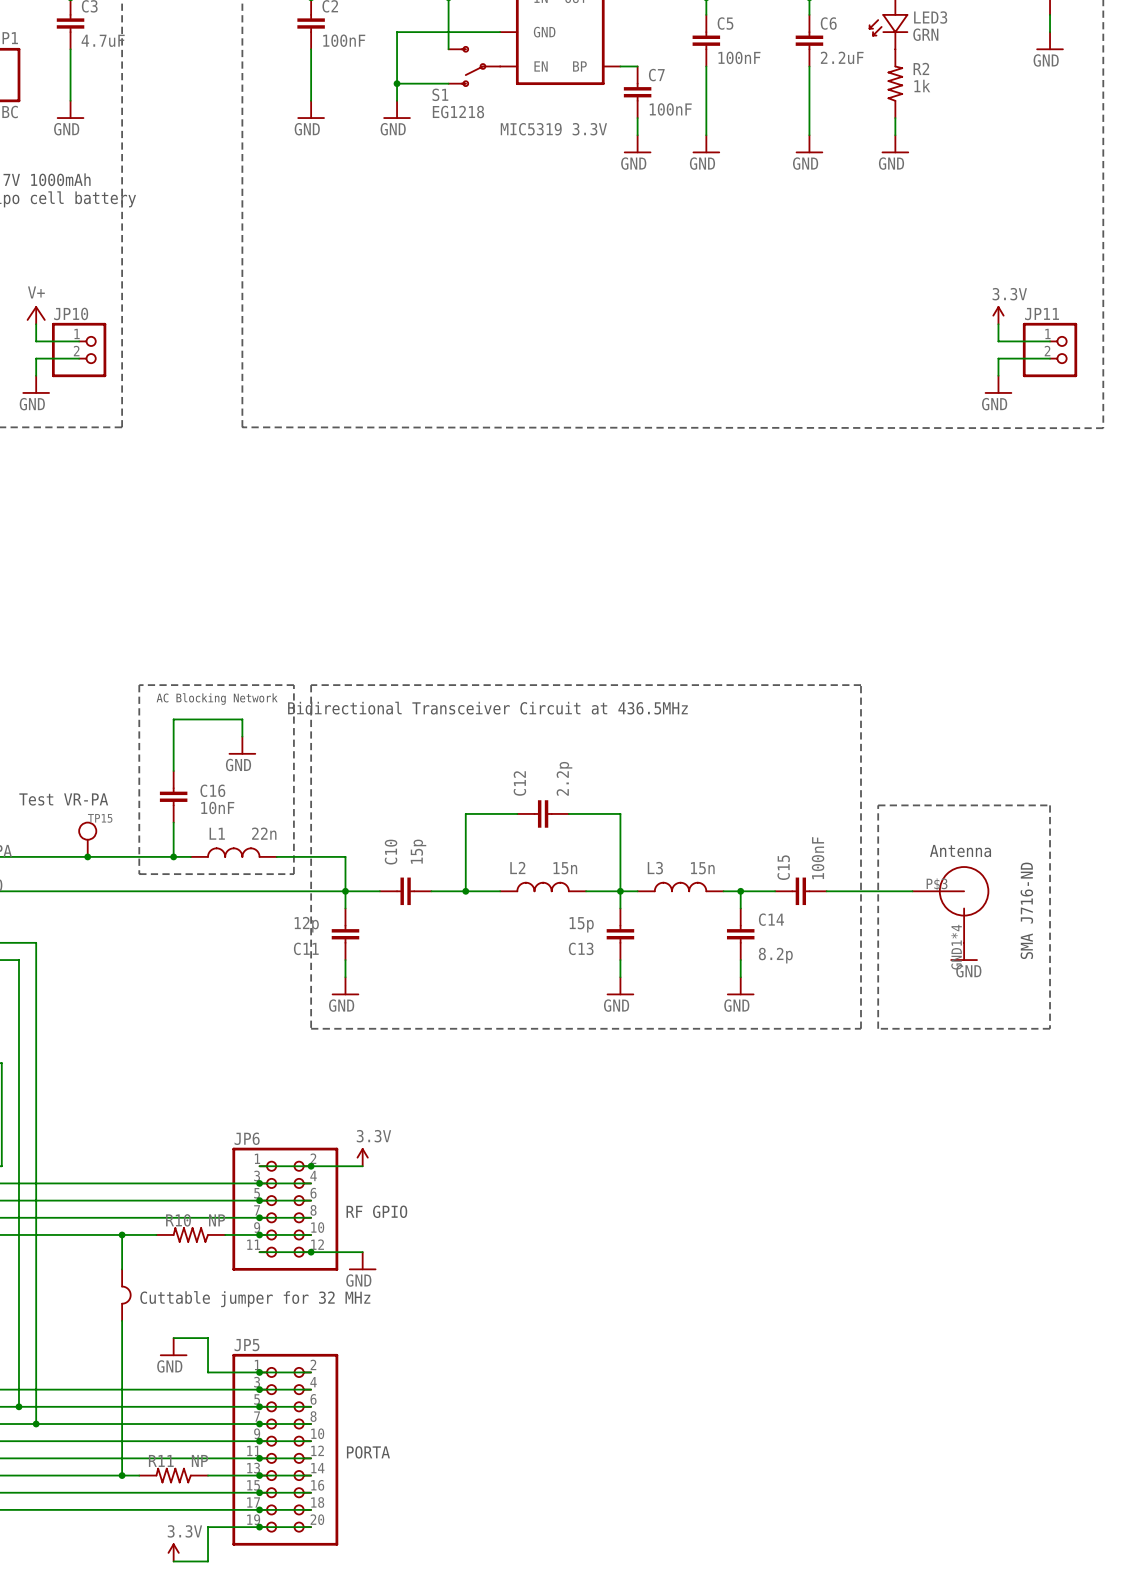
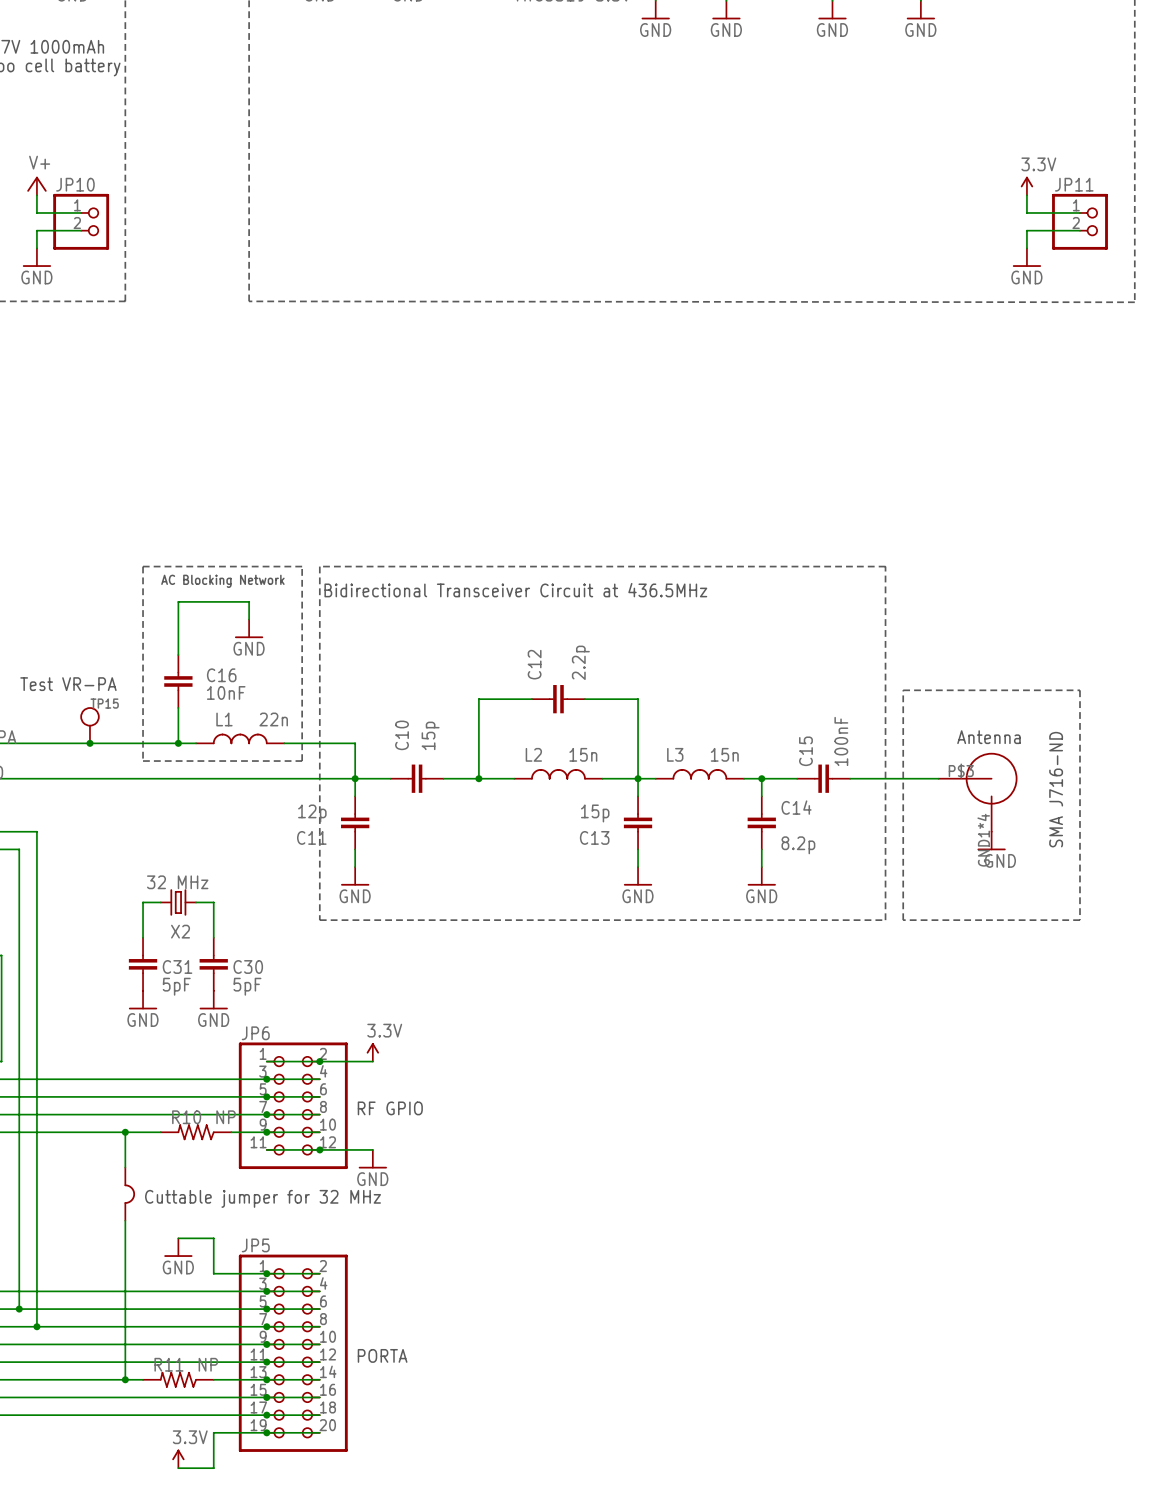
wire: none -> (160, 902) (143, 902) (143, 937)
X2: none -> 32 MHz (178, 902)
wire: none -> (196, 902) (213, 902) (213, 937)
C31: none -> 5pF (143, 964)
C30: none -> 5pF (213, 964)
power symbol: none -> GND (143, 1000)
power symbol: none -> GND (213, 1000)

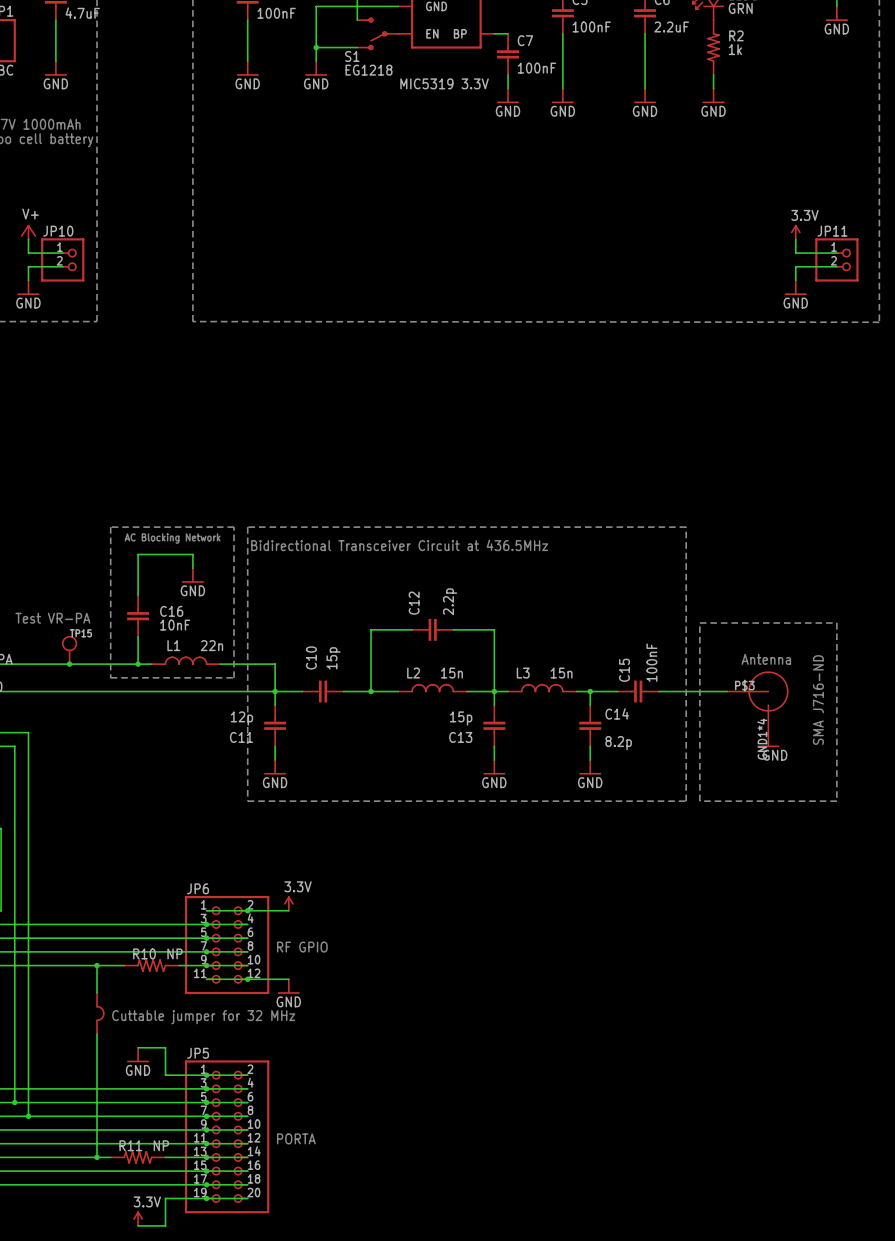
wire: (160, 902) (143, 902) (143, 937) -> none
X2: 32 MHz (178, 902) -> none
wire: (196, 902) (213, 902) (213, 937) -> none
C31: 5pF (143, 964) -> none
C30: 5pF (213, 964) -> none
power symbol: GND (143, 1000) -> none
power symbol: GND (213, 1000) -> none

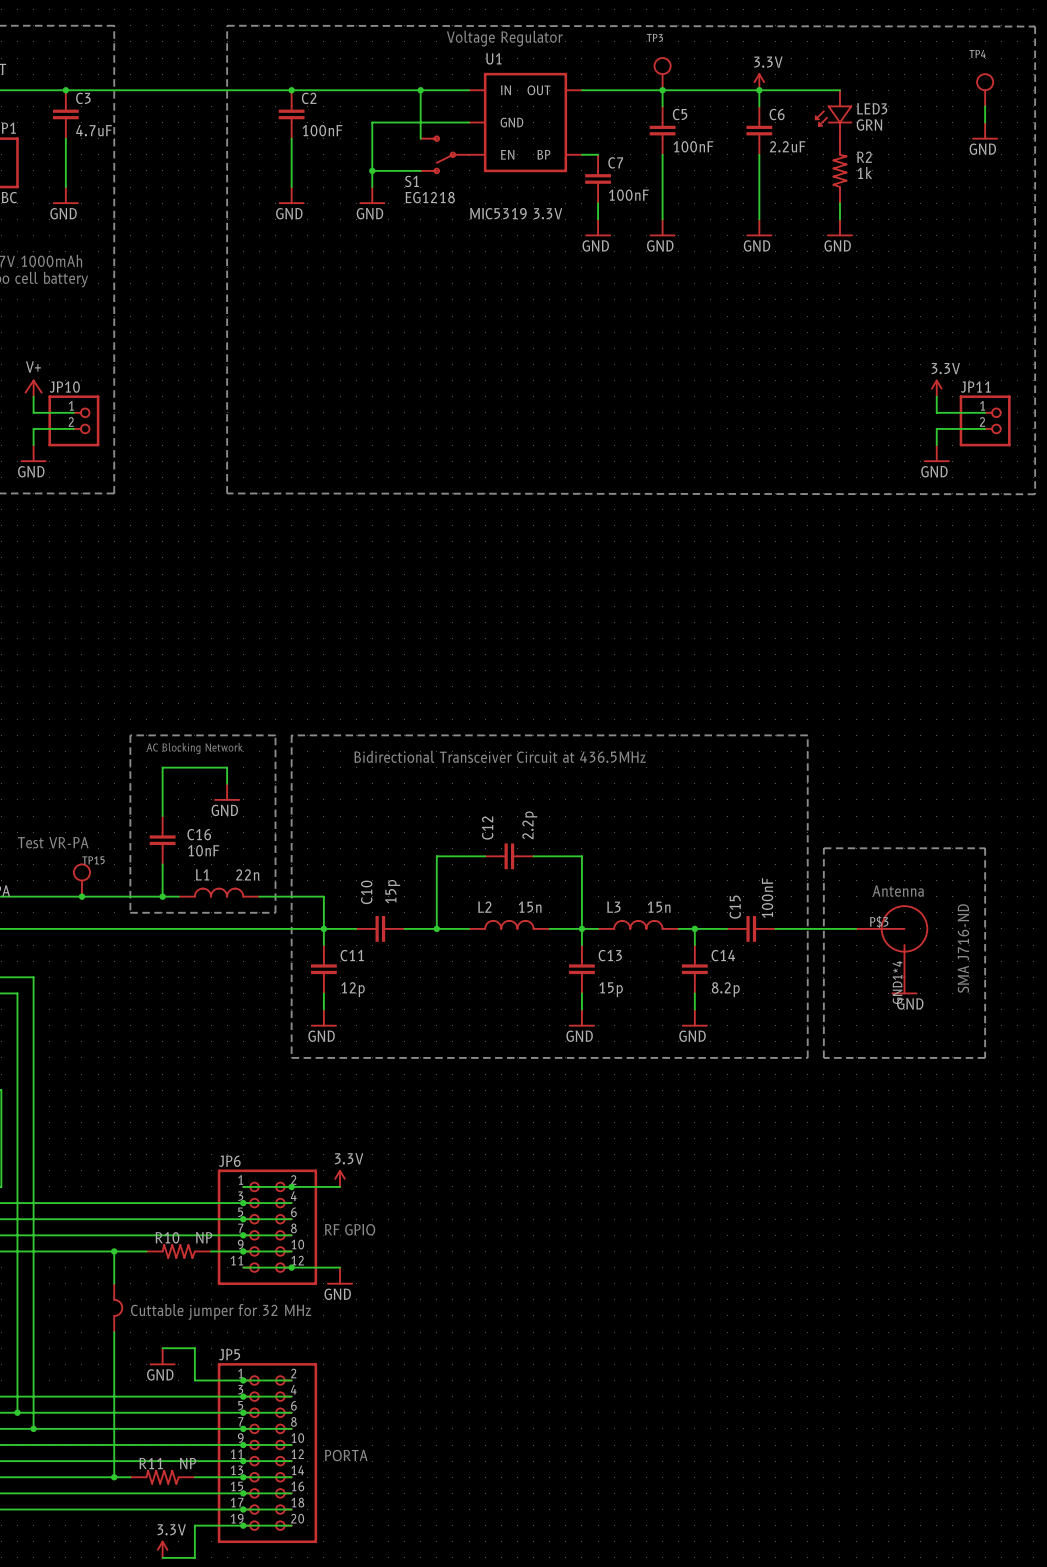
C11 value position: 12p (241, 718) -> 12p (353, 989)
C13 value position: 15p (461, 718) -> 15p (611, 989)
C11 name position: C11 (241, 737) -> C11 (352, 955)
C13 name position: C13 (460, 737) -> C13 (610, 955)

